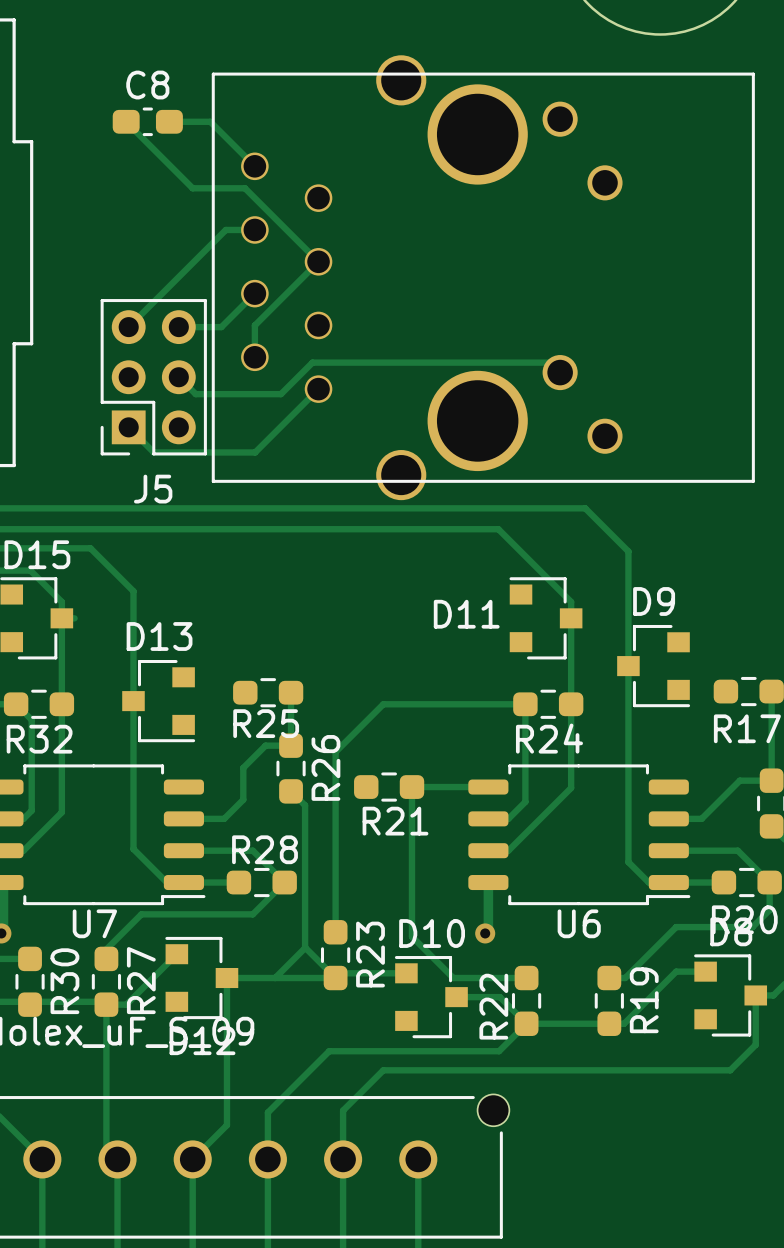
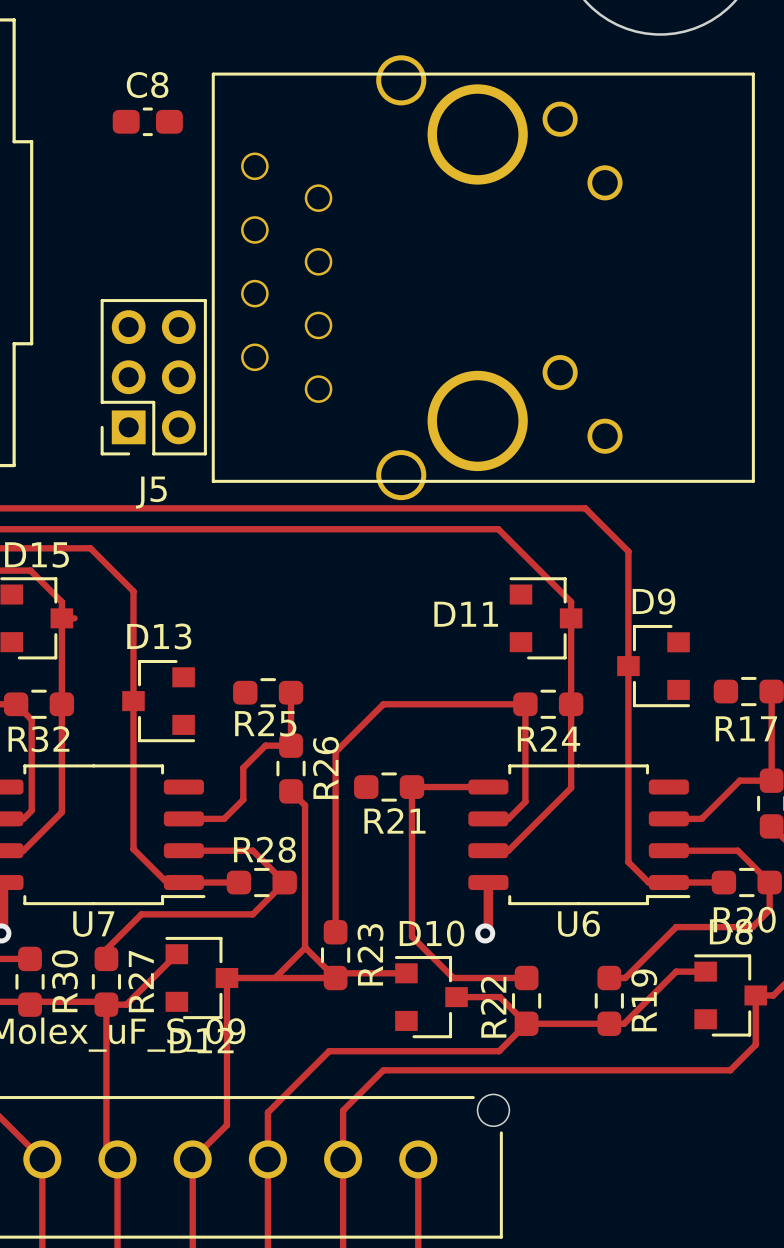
track: (126, 121) (192, 188) (245, 188) (318, 261) (254, 325) (254, 357) -> none
track: (169, 121) (210, 121) (254, 166) -> none
track: (254, 229) (225, 229) (128, 327) -> none
track: (254, 293) (221, 327) (178, 327) -> none
track: (560, 372) (550, 362) (312, 362) (280, 394) (195, 394) (178, 377) -> none
track: (318, 389) (255, 452) (153, 452) (128, 427) -> none

